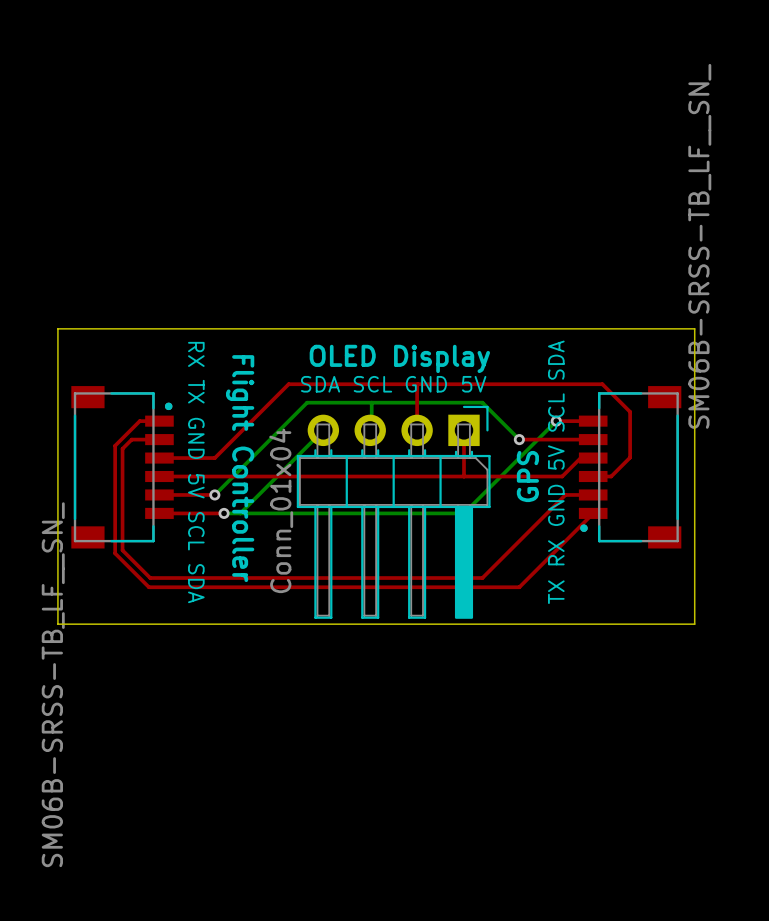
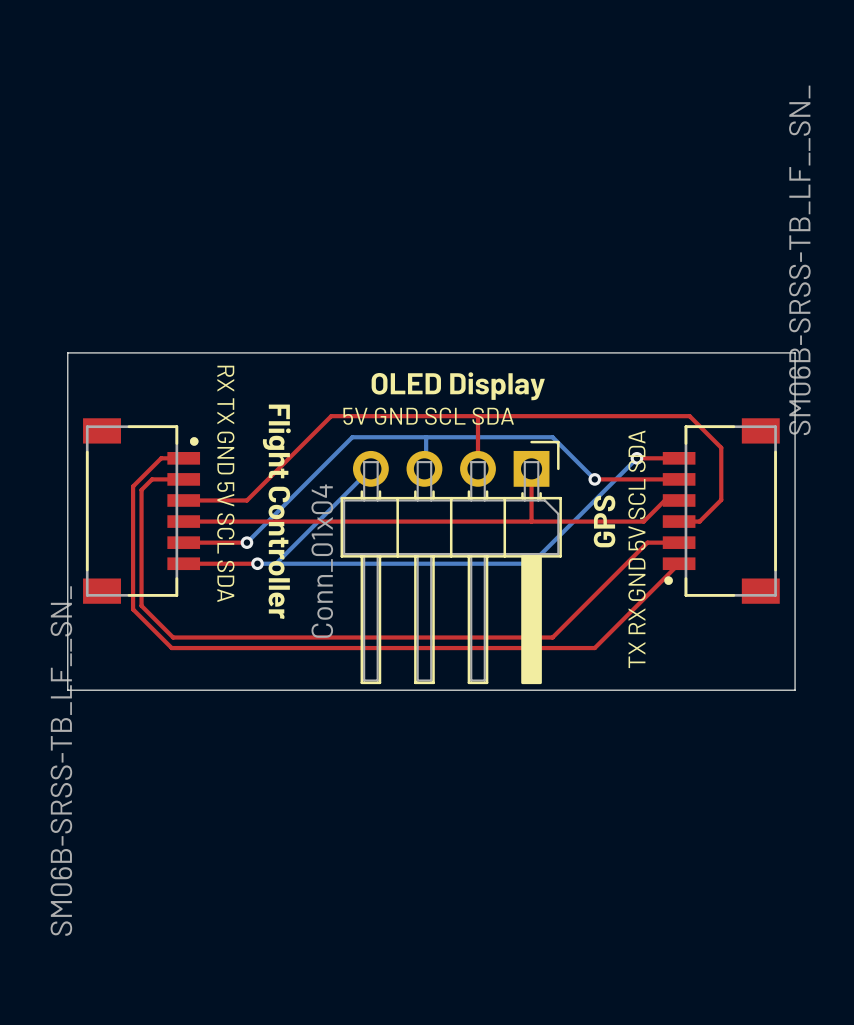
text: SDA SCL GND 5V (393, 384) -> 5V GND SCL SDA (428, 416)

